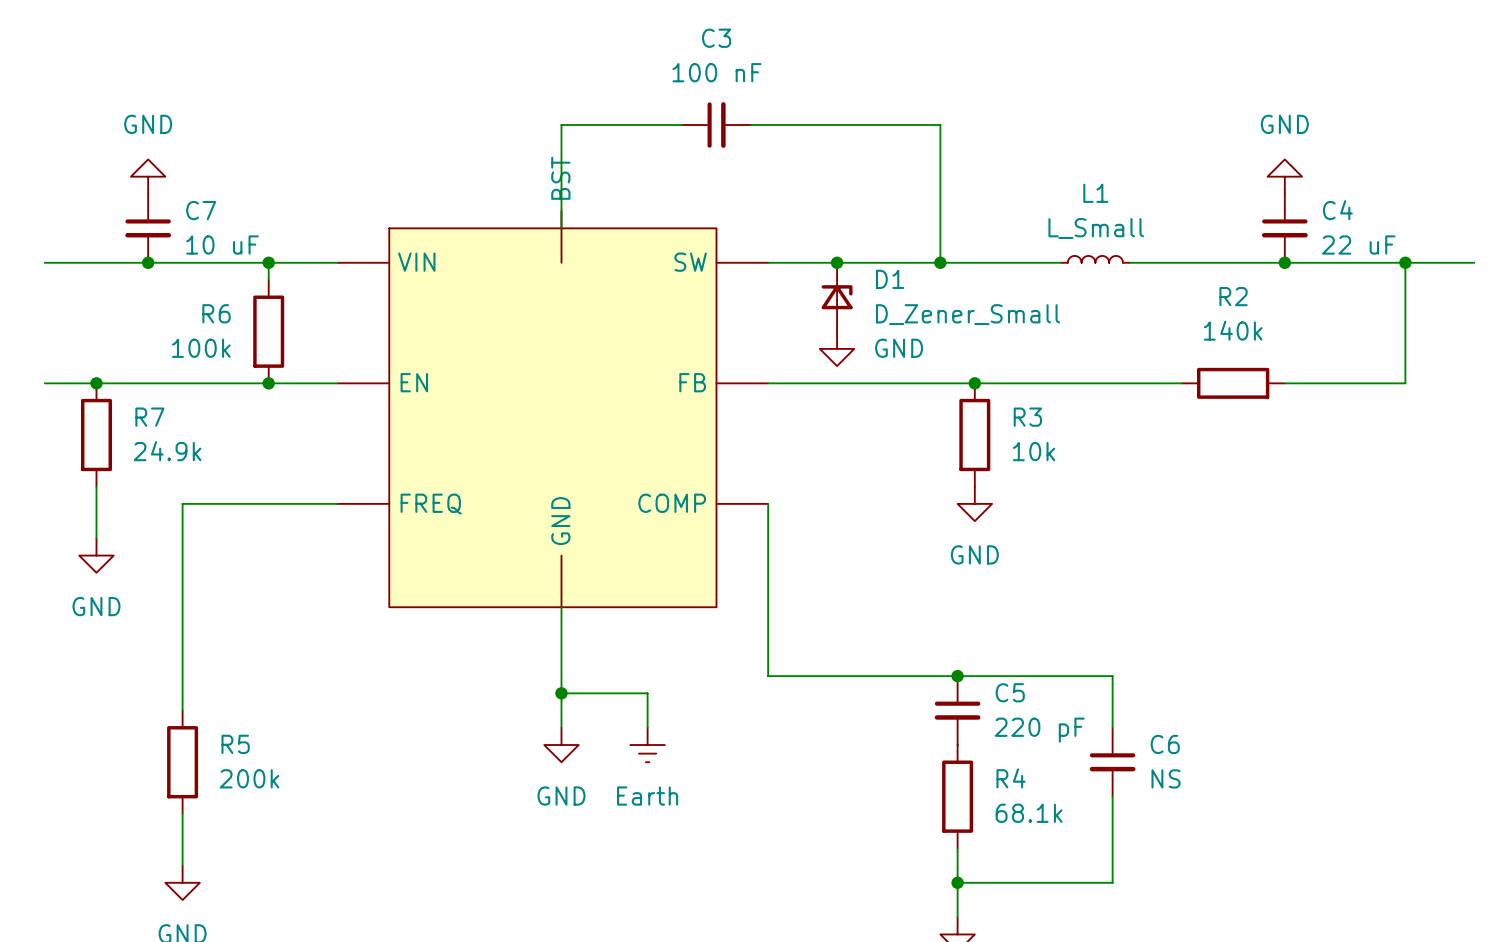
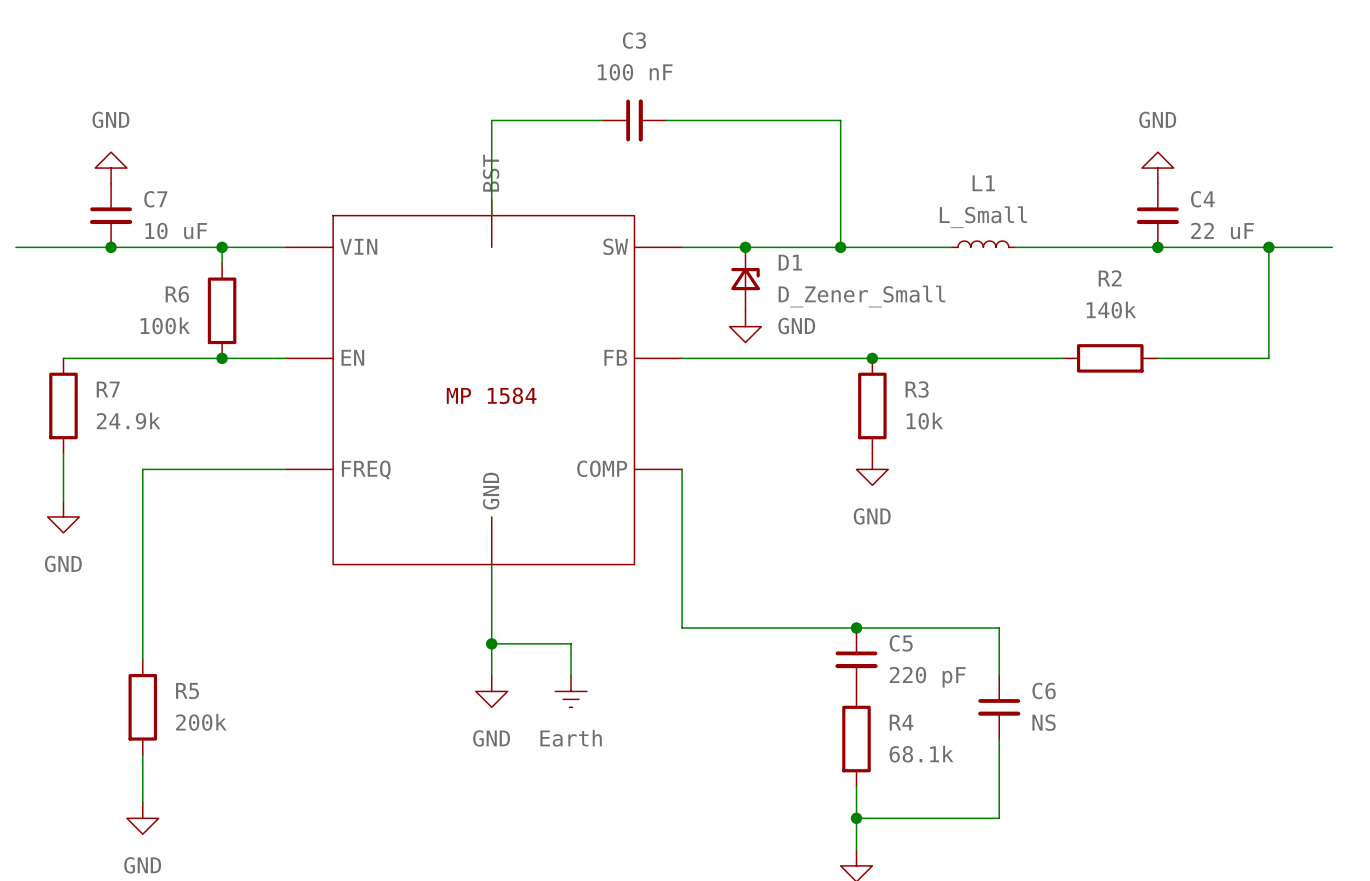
wire: (44, 383) (96, 383) -> none
junction: (96, 383) -> none
part text: none -> MP 1584 (491, 395)

